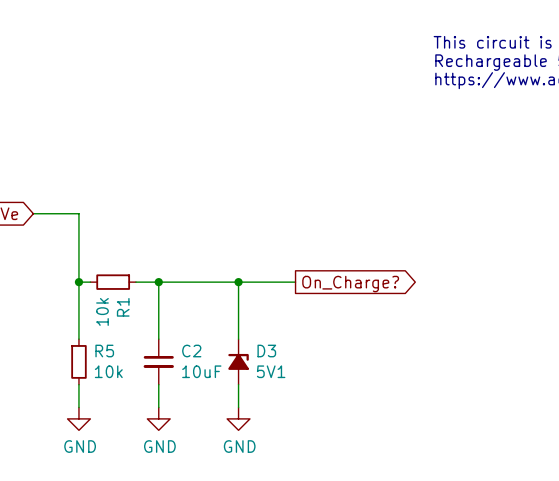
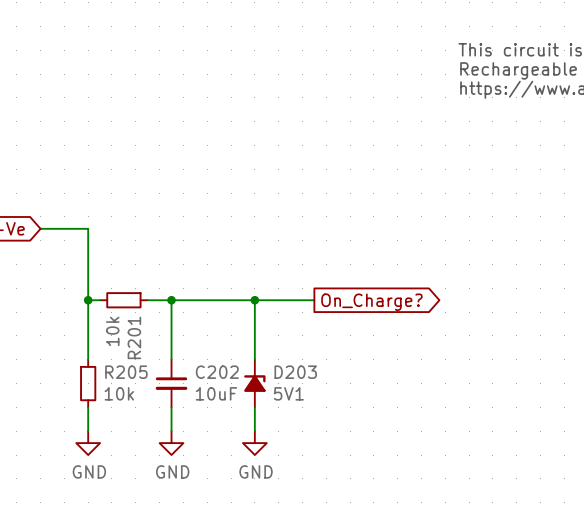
R1 name: R1 (123, 307) -> R201 (134, 337)
R5 name: R5 (104, 351) -> R205 (126, 372)
C2 name: C2 (191, 351) -> C202 (217, 372)
D3 name: D3 (266, 351) -> D203 (295, 372)

